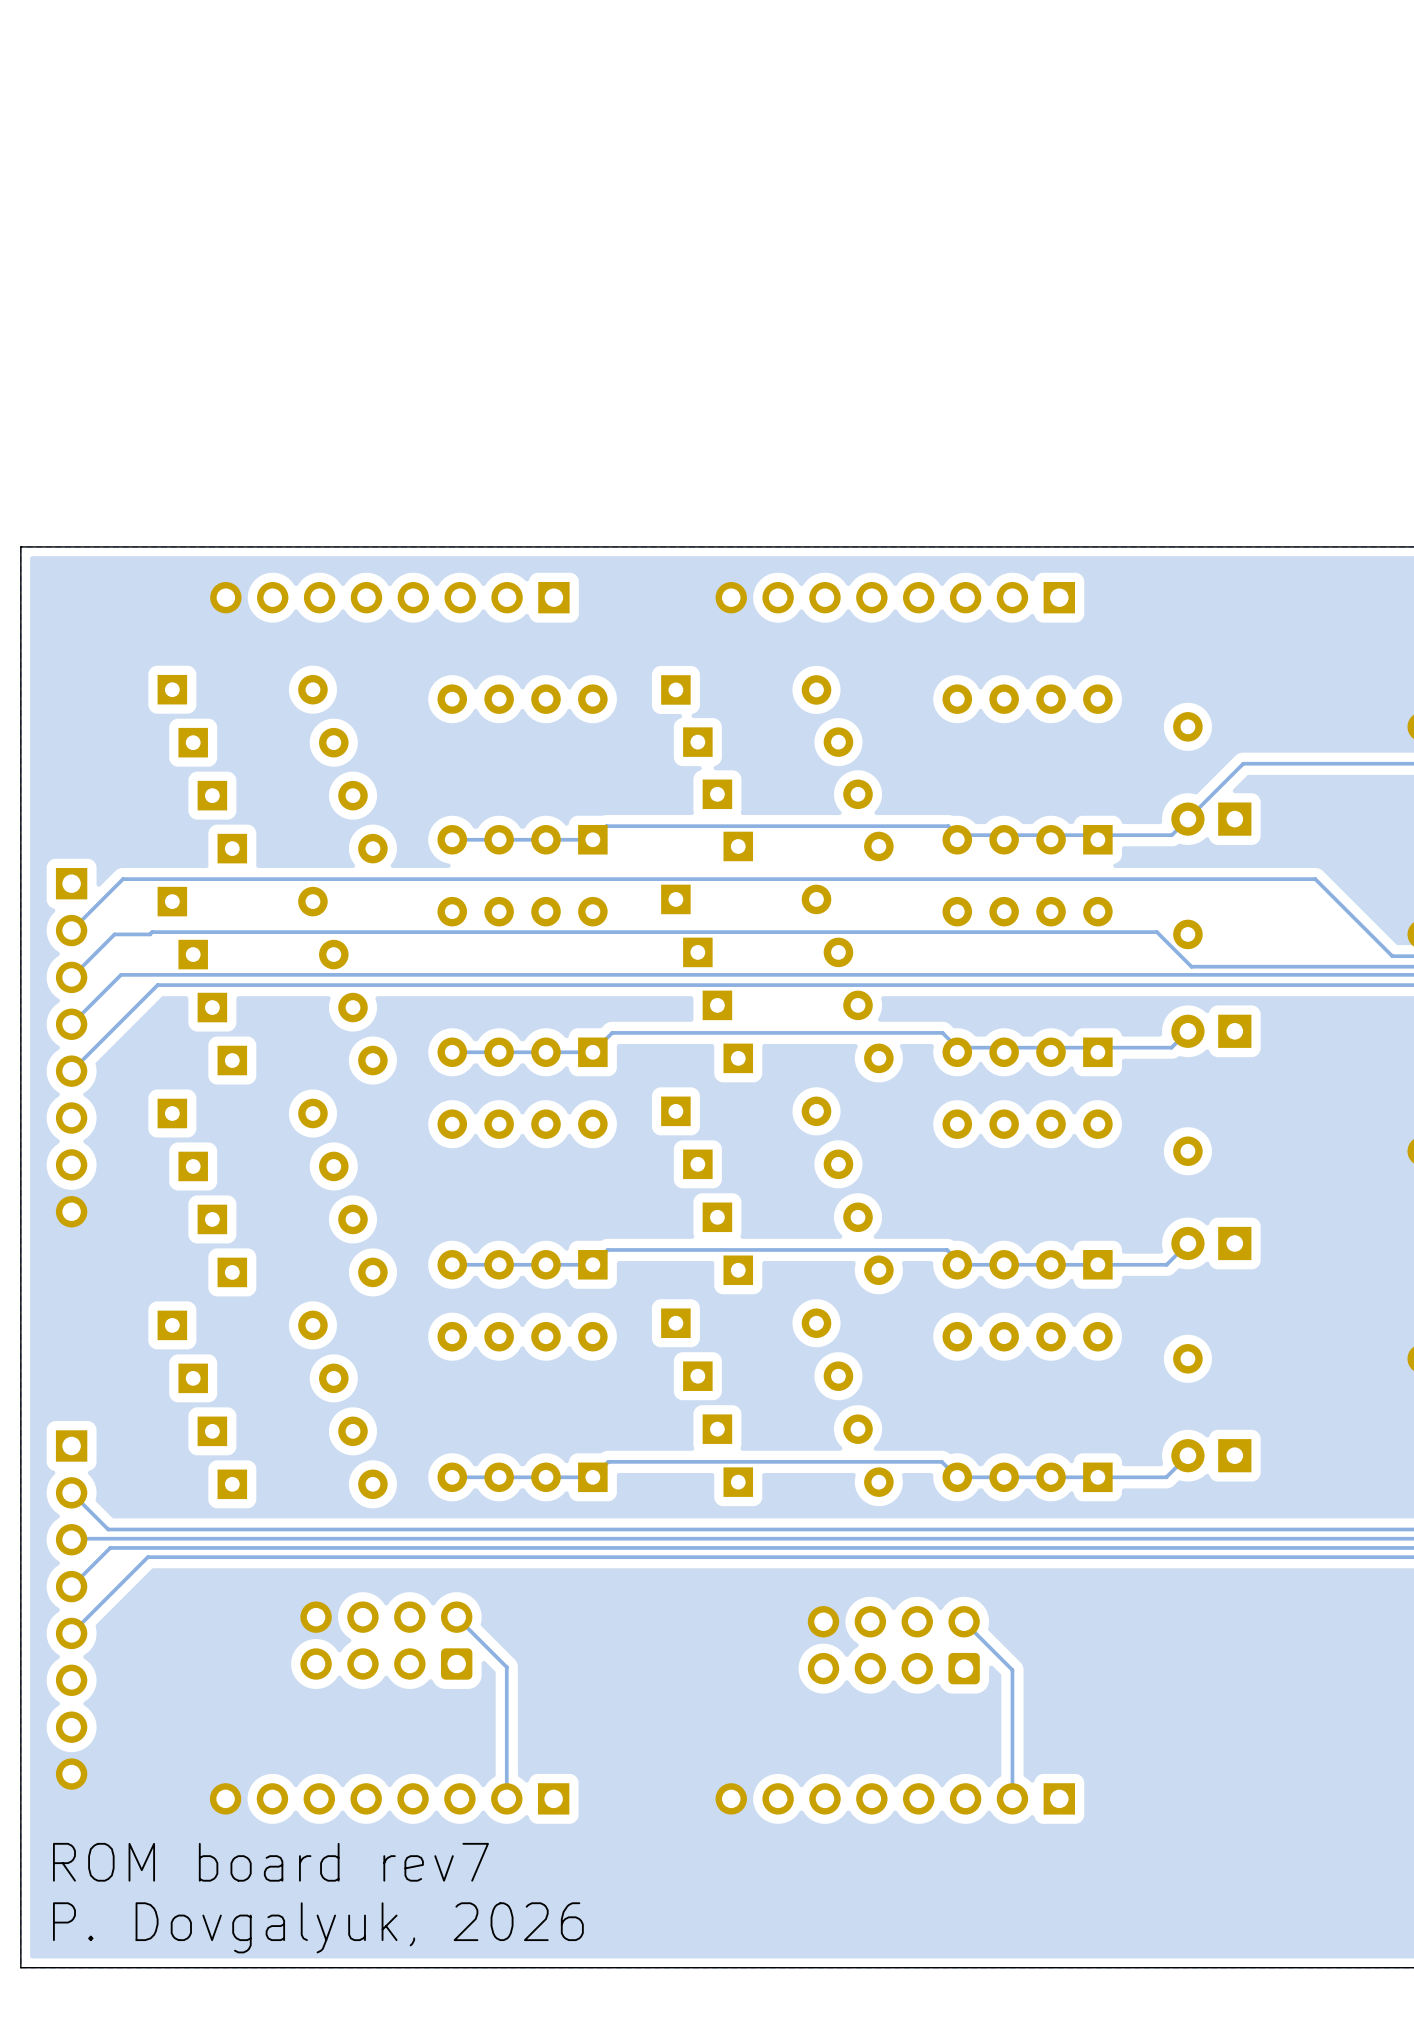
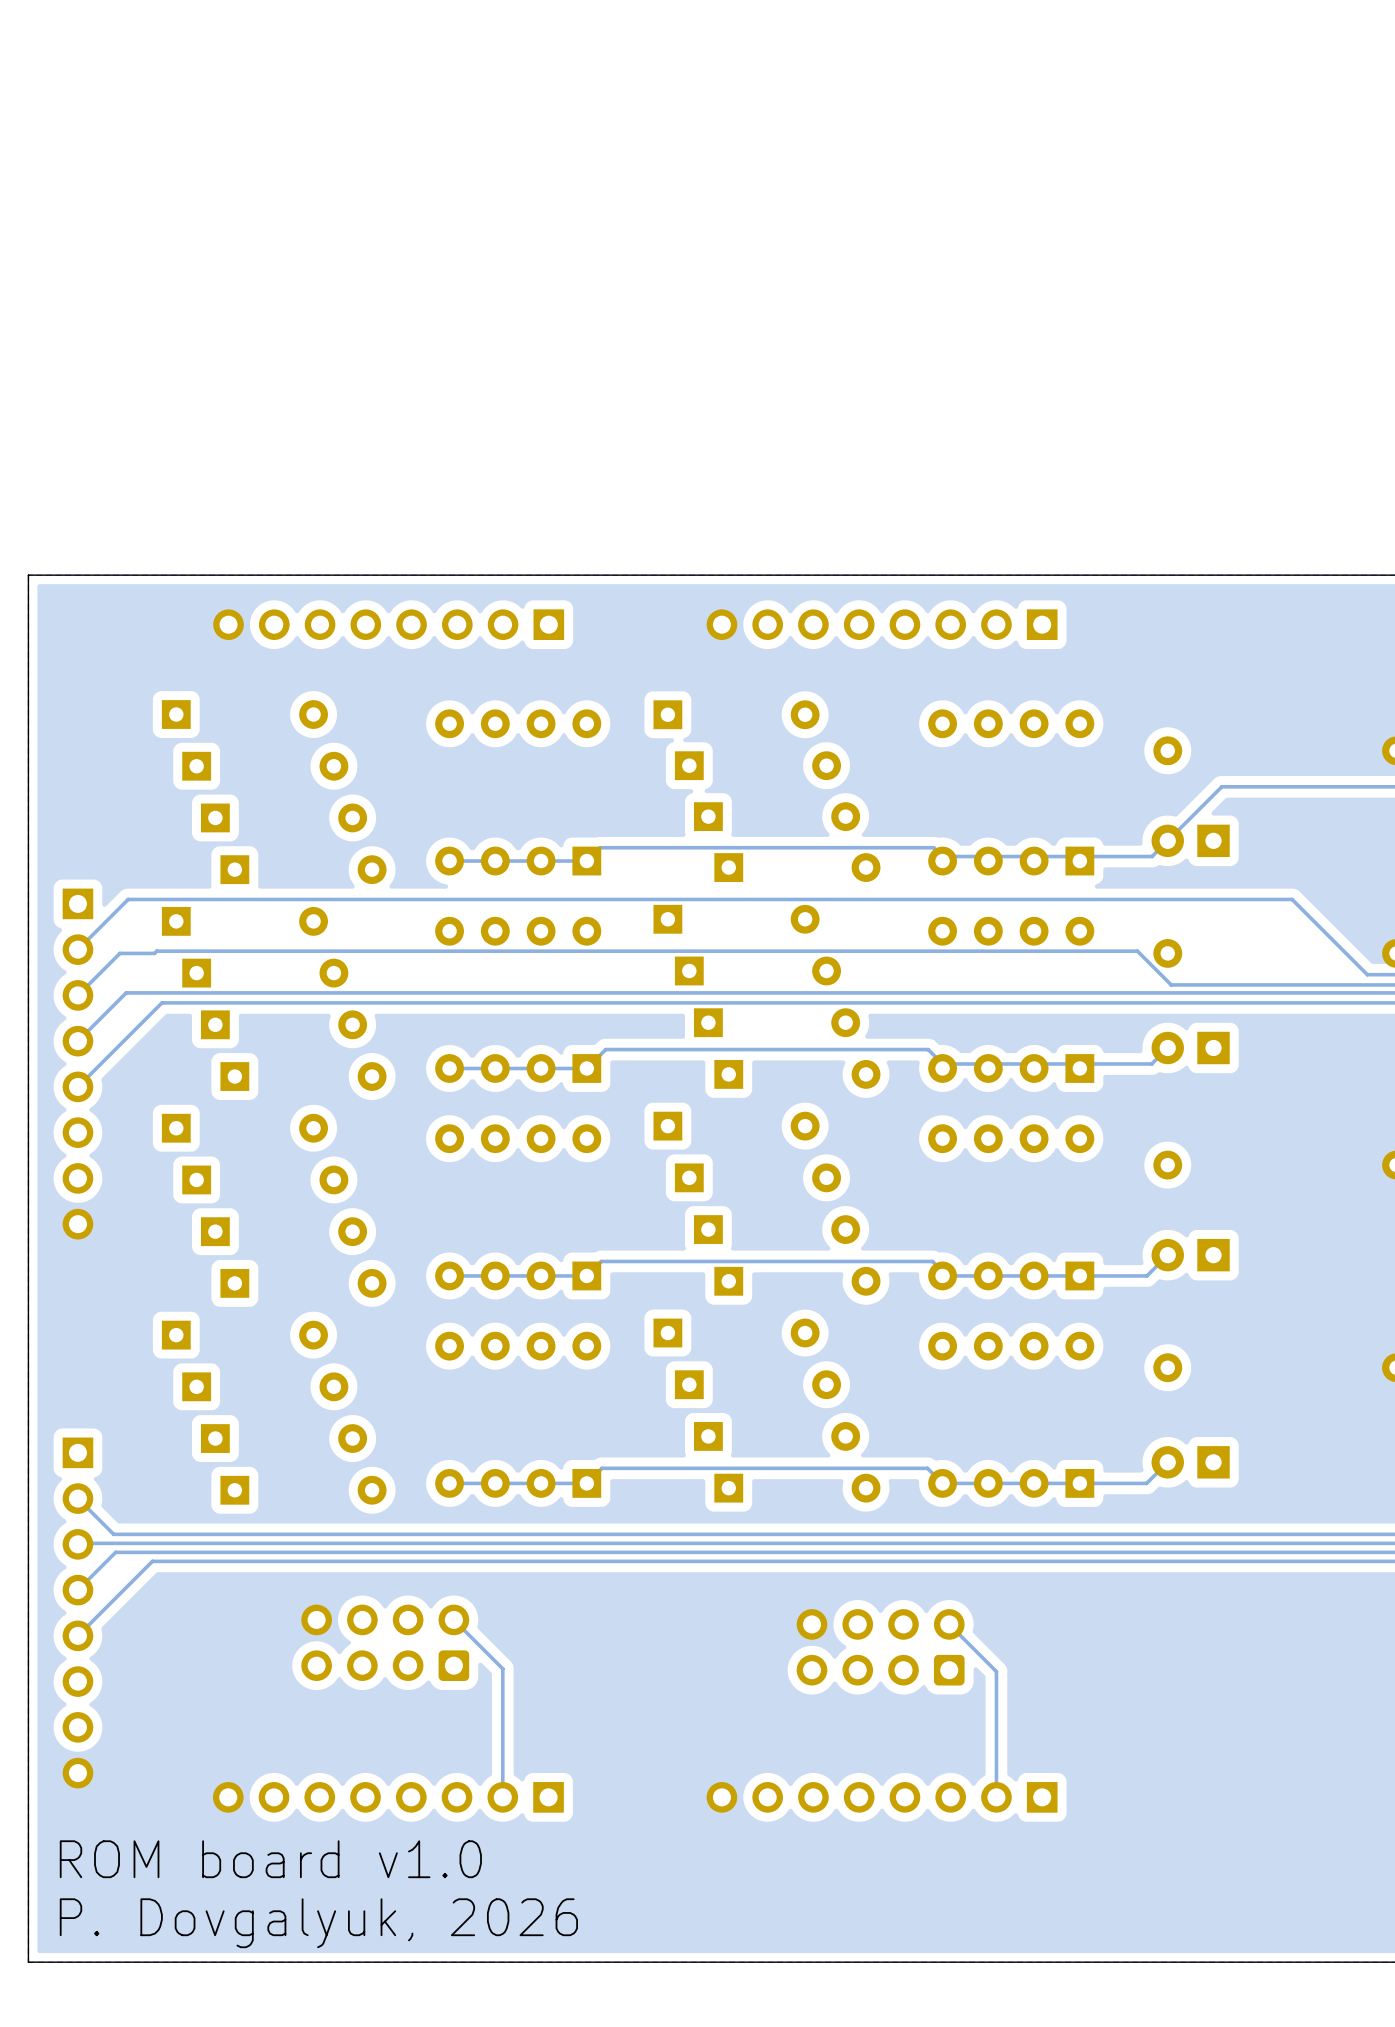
text: ROM board rev7 (270, 1862) -> ROM board v1.0 (270, 1859)

